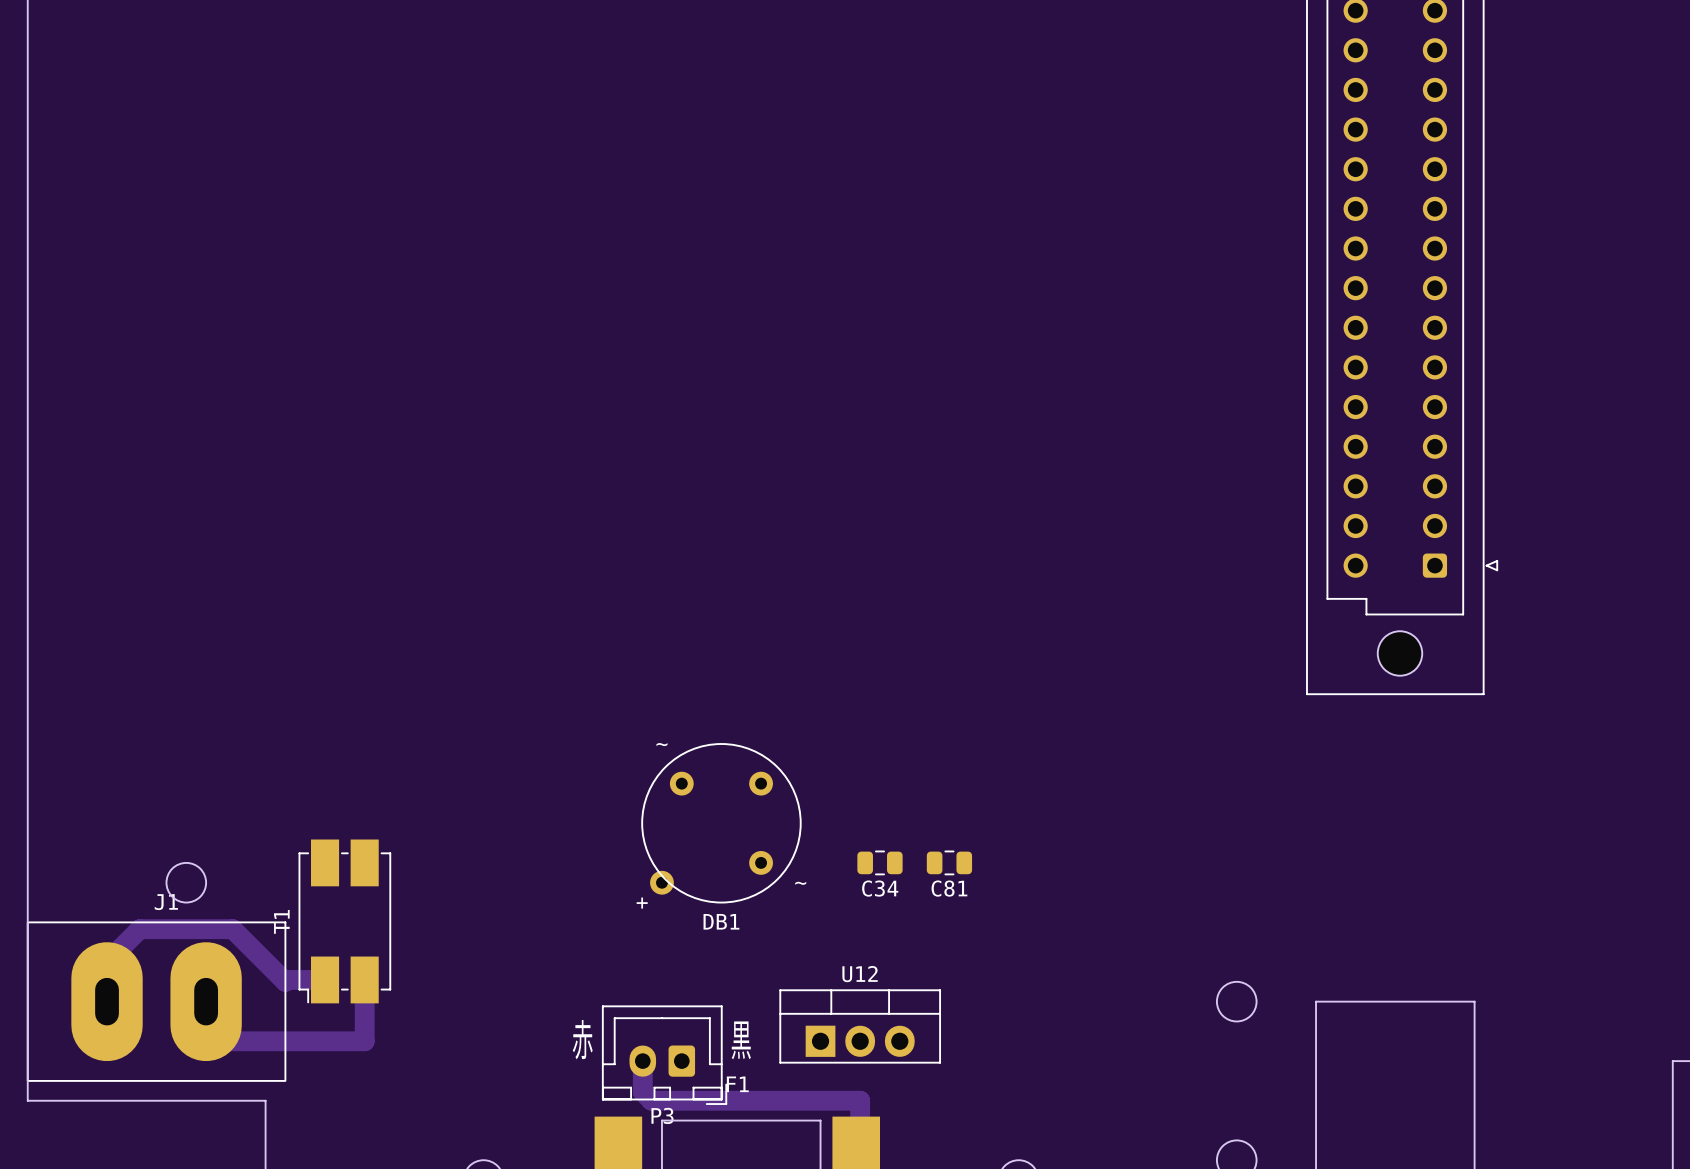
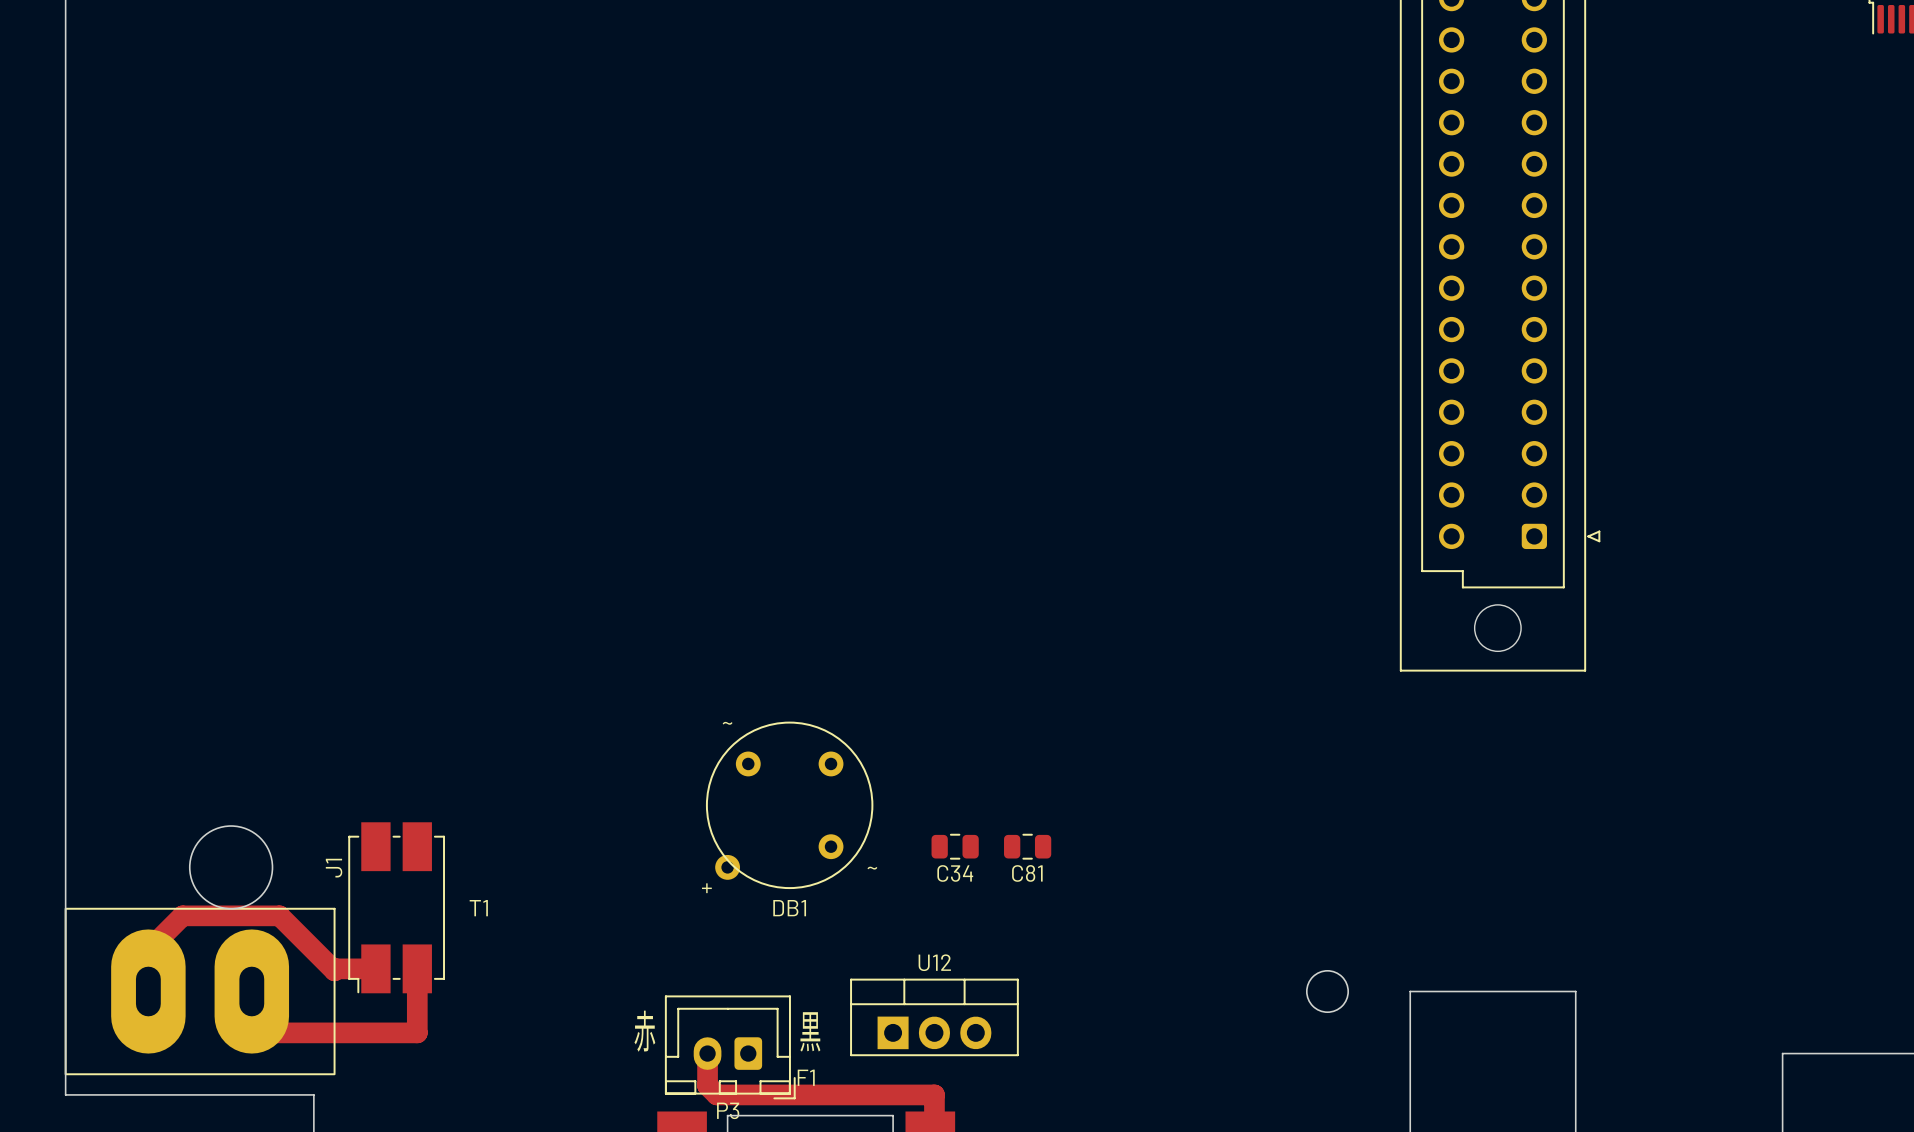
round board edge size: [165, 862, 207, 904] -> [188, 825, 274, 910]
J1 name rotation: 0° (166, 902) -> 90° counterclockwise (334, 868)
J1 name position: J1 (166, 902) -> J1 (334, 868)
T1 name rotation: 0° (281, 921) -> 90° clockwise (478, 908)
T1 name position: T1 (281, 921) -> T1 (478, 908)

